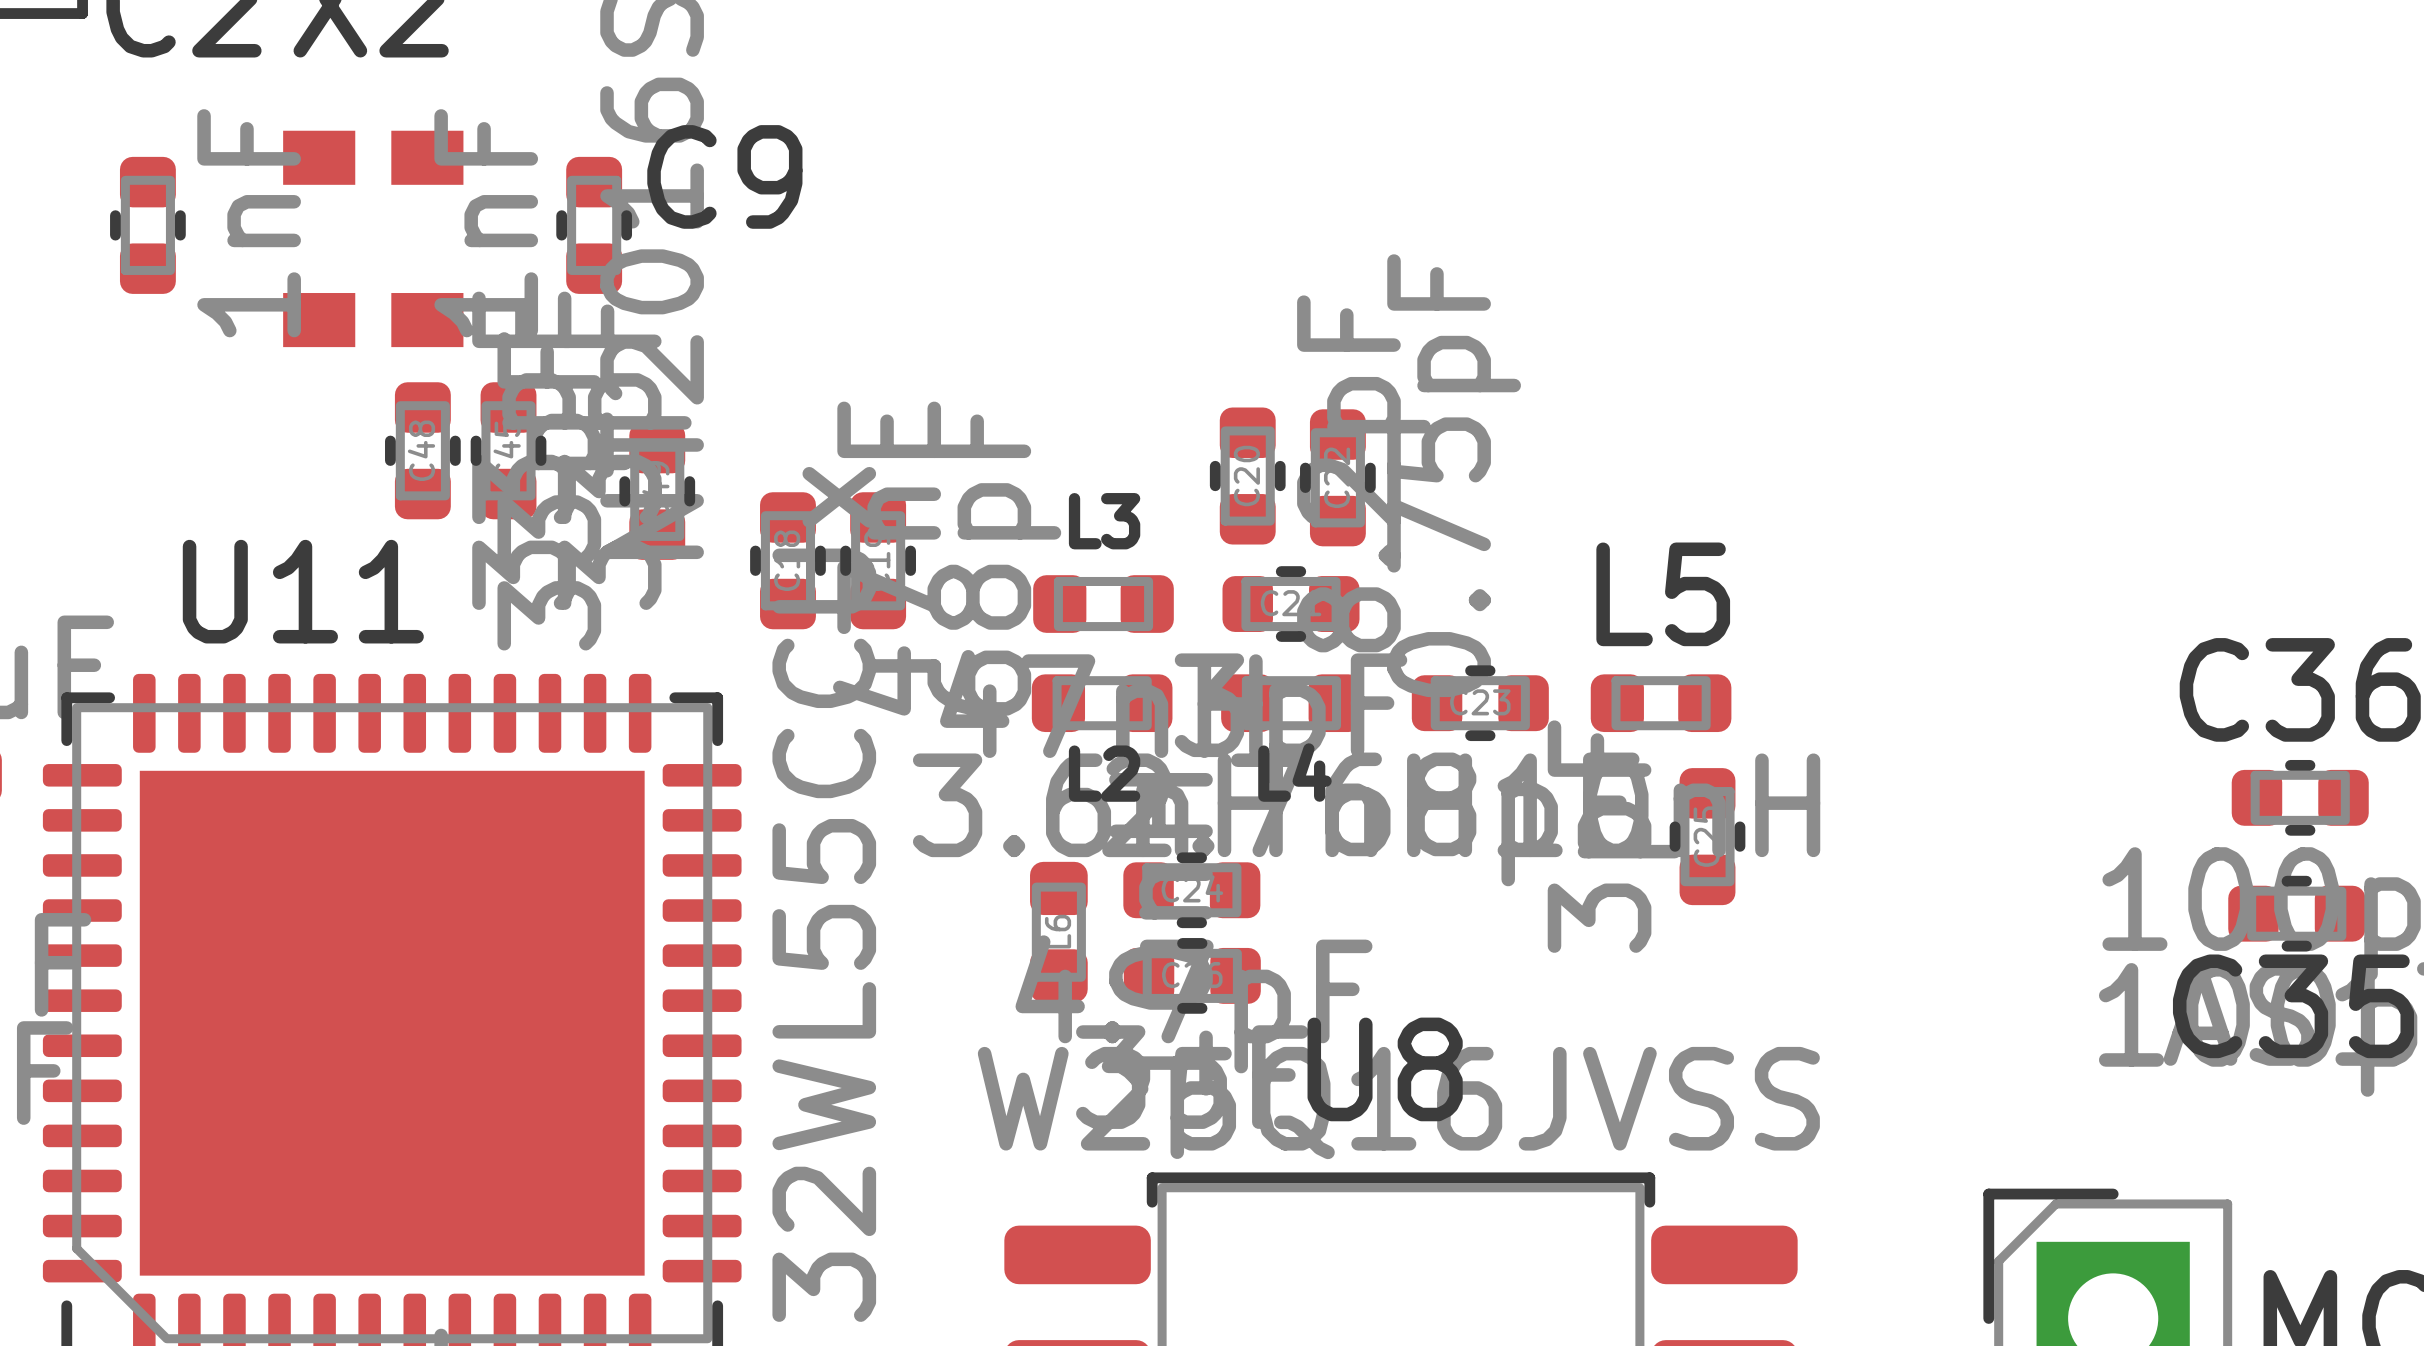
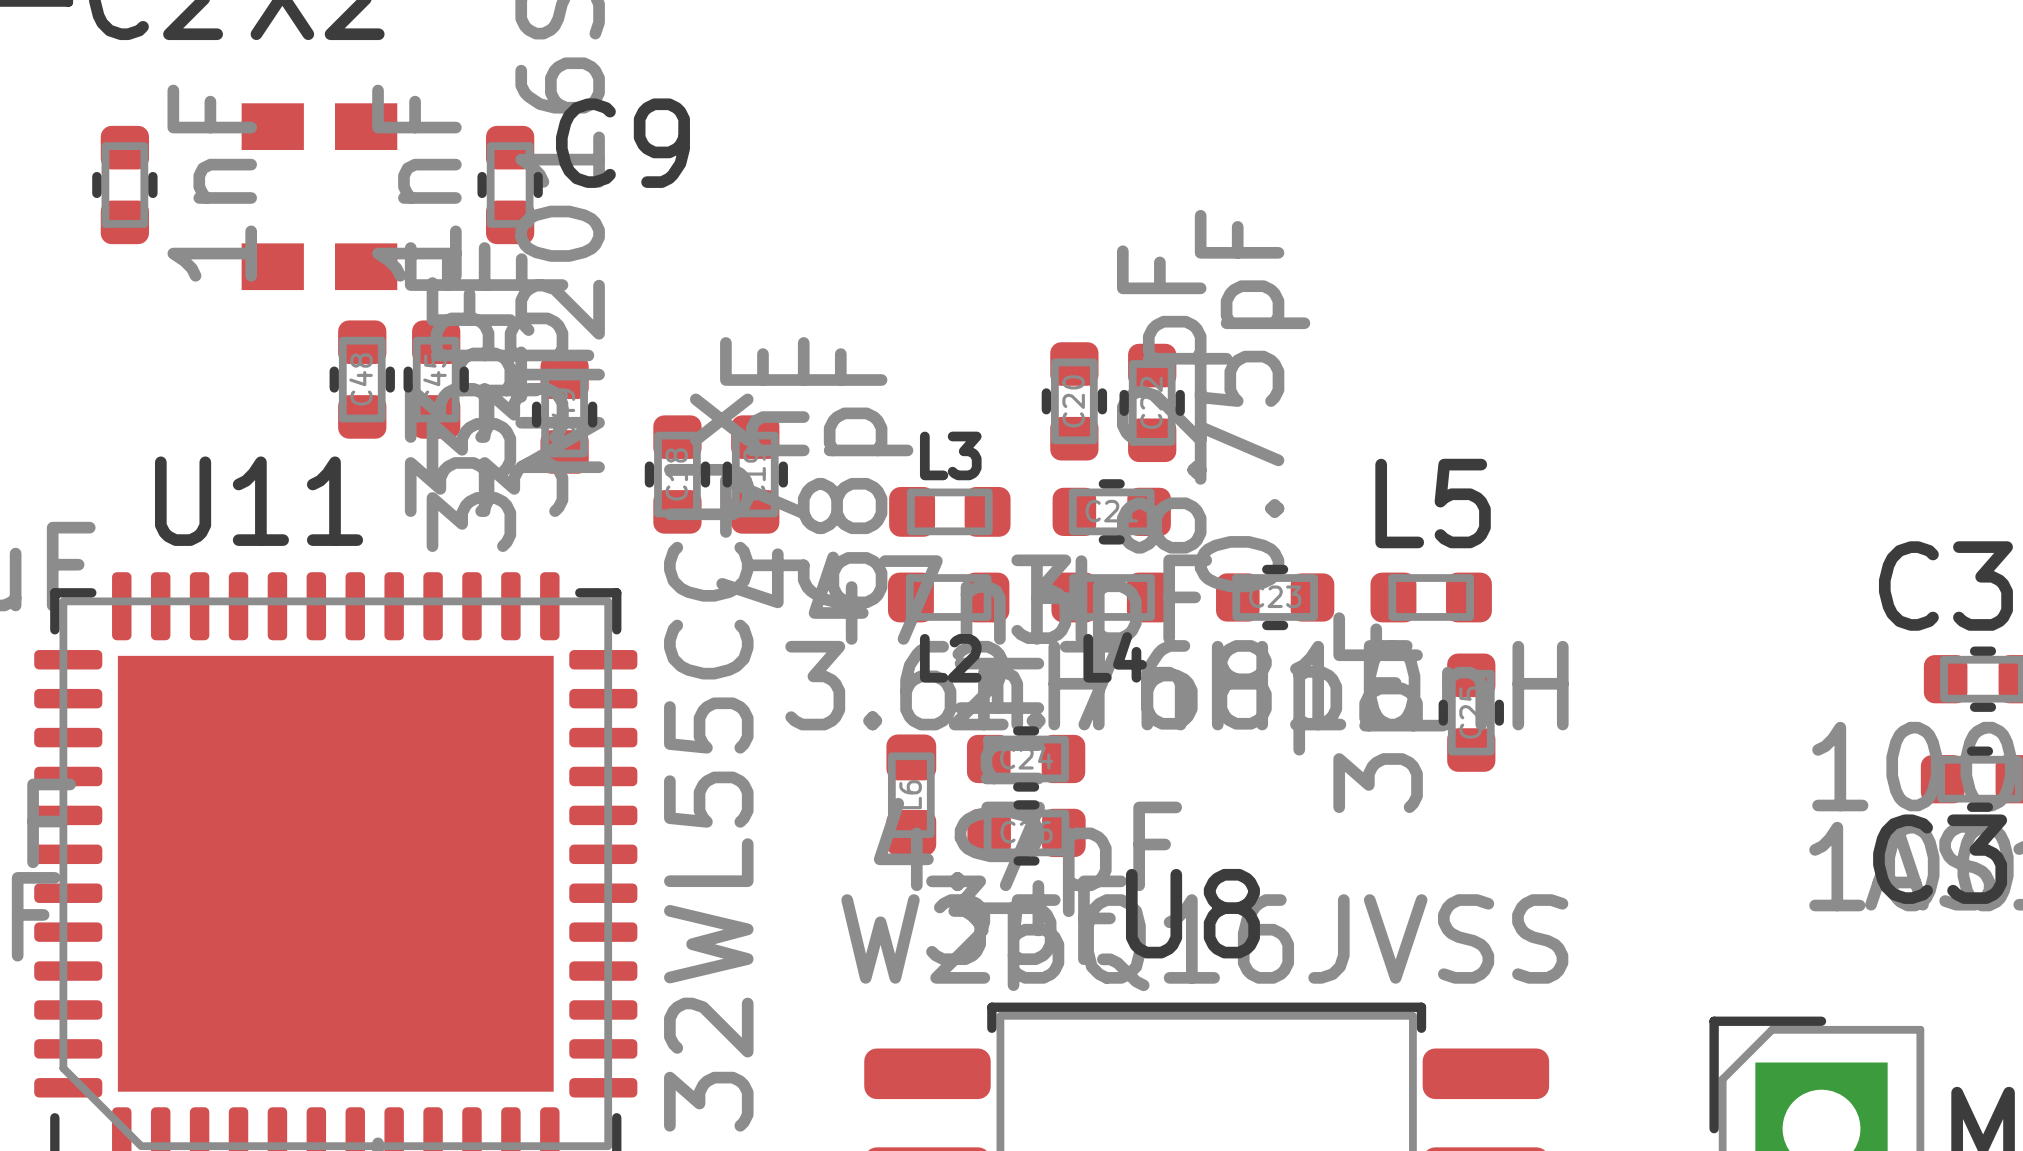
L3 name position: L3 (1104, 521) -> L3 (950, 455)

